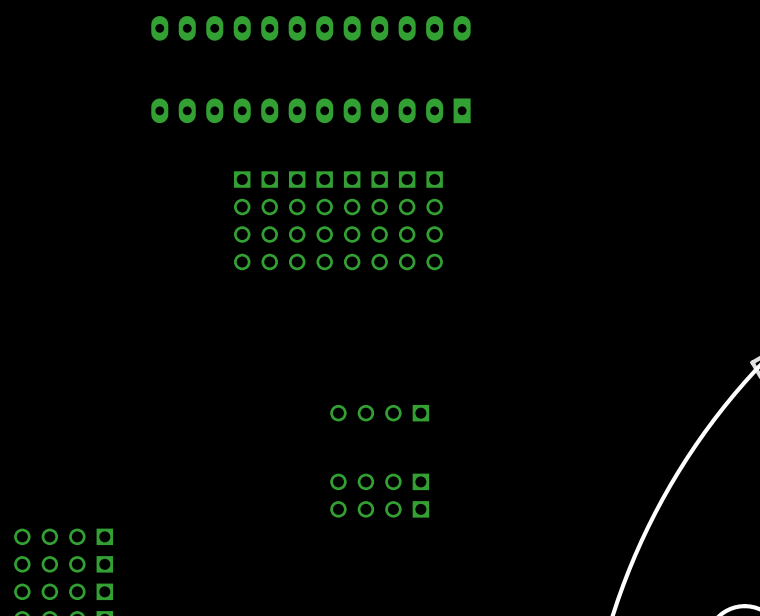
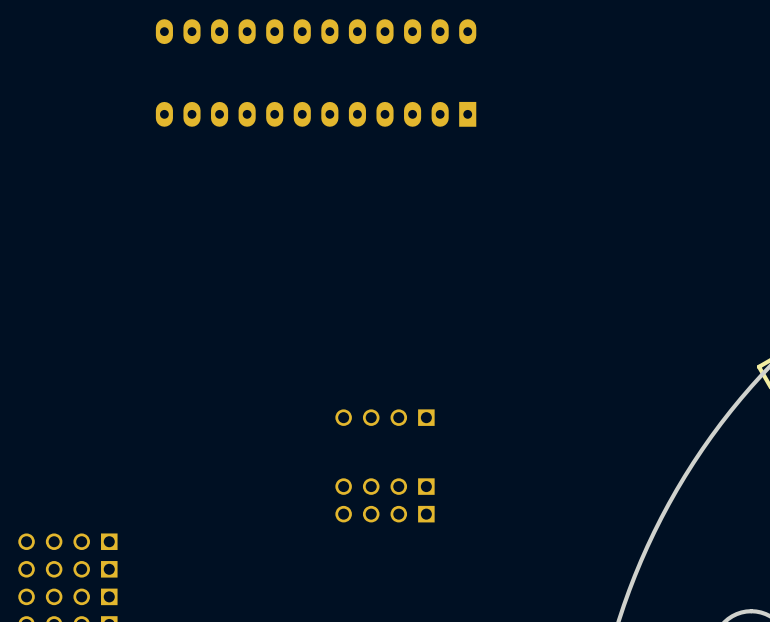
part: (242, 220) -> none
part: (269, 220) -> none
part: (297, 220) -> none
part: (324, 220) -> none
part: (352, 220) -> none
part: (379, 220) -> none
part: (407, 220) -> none
part: (434, 220) -> none

